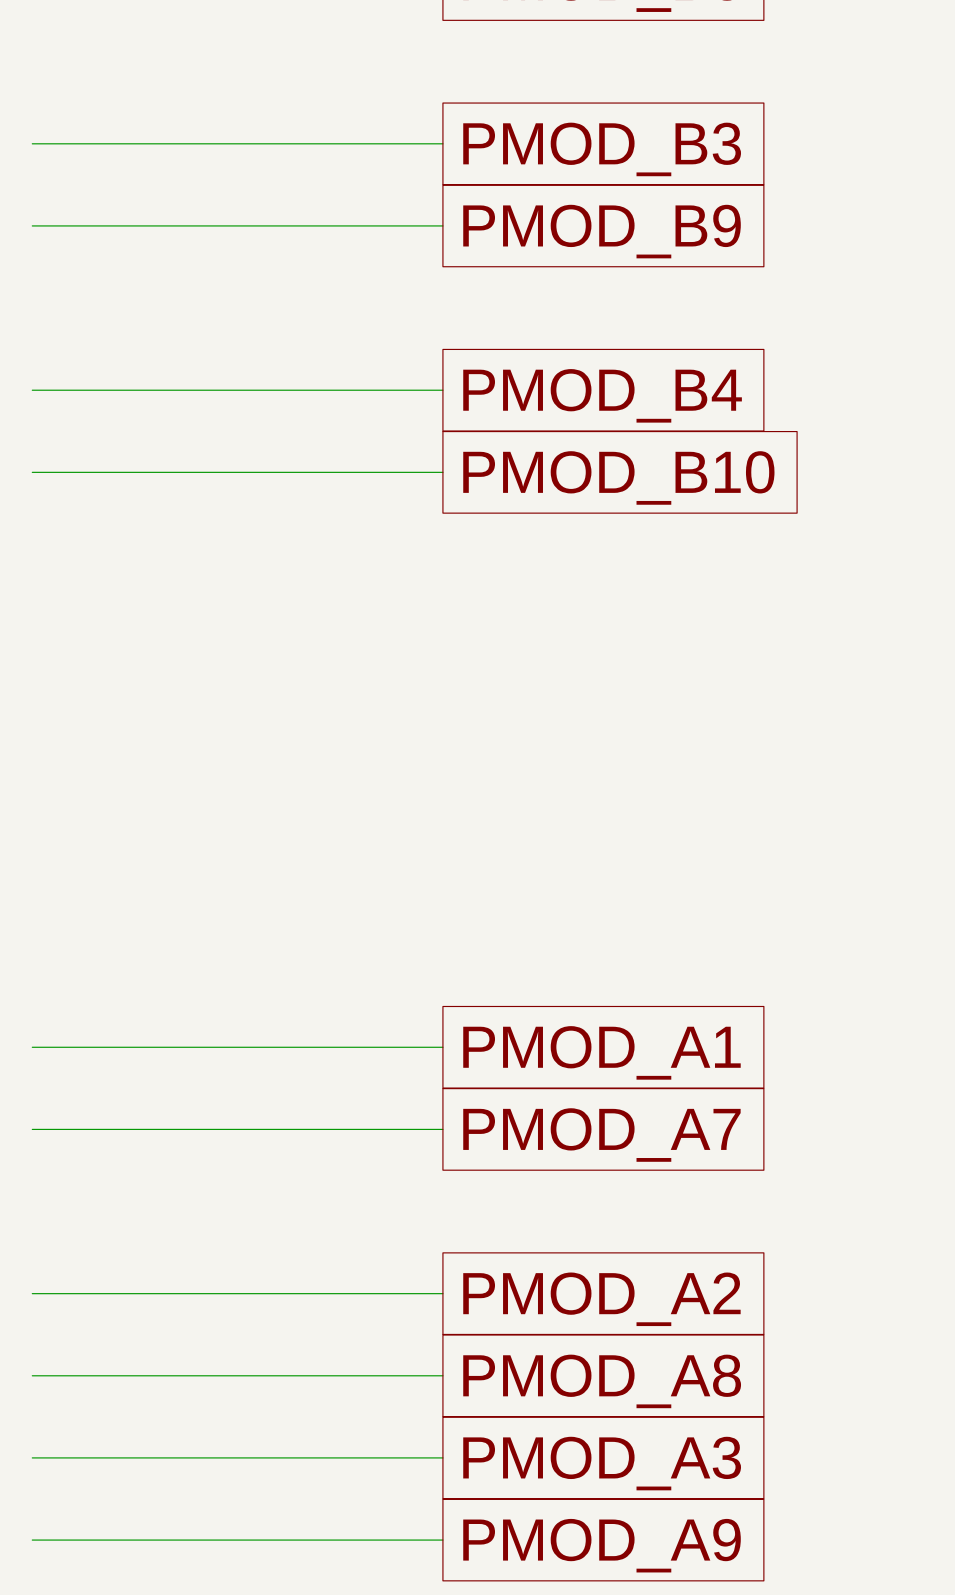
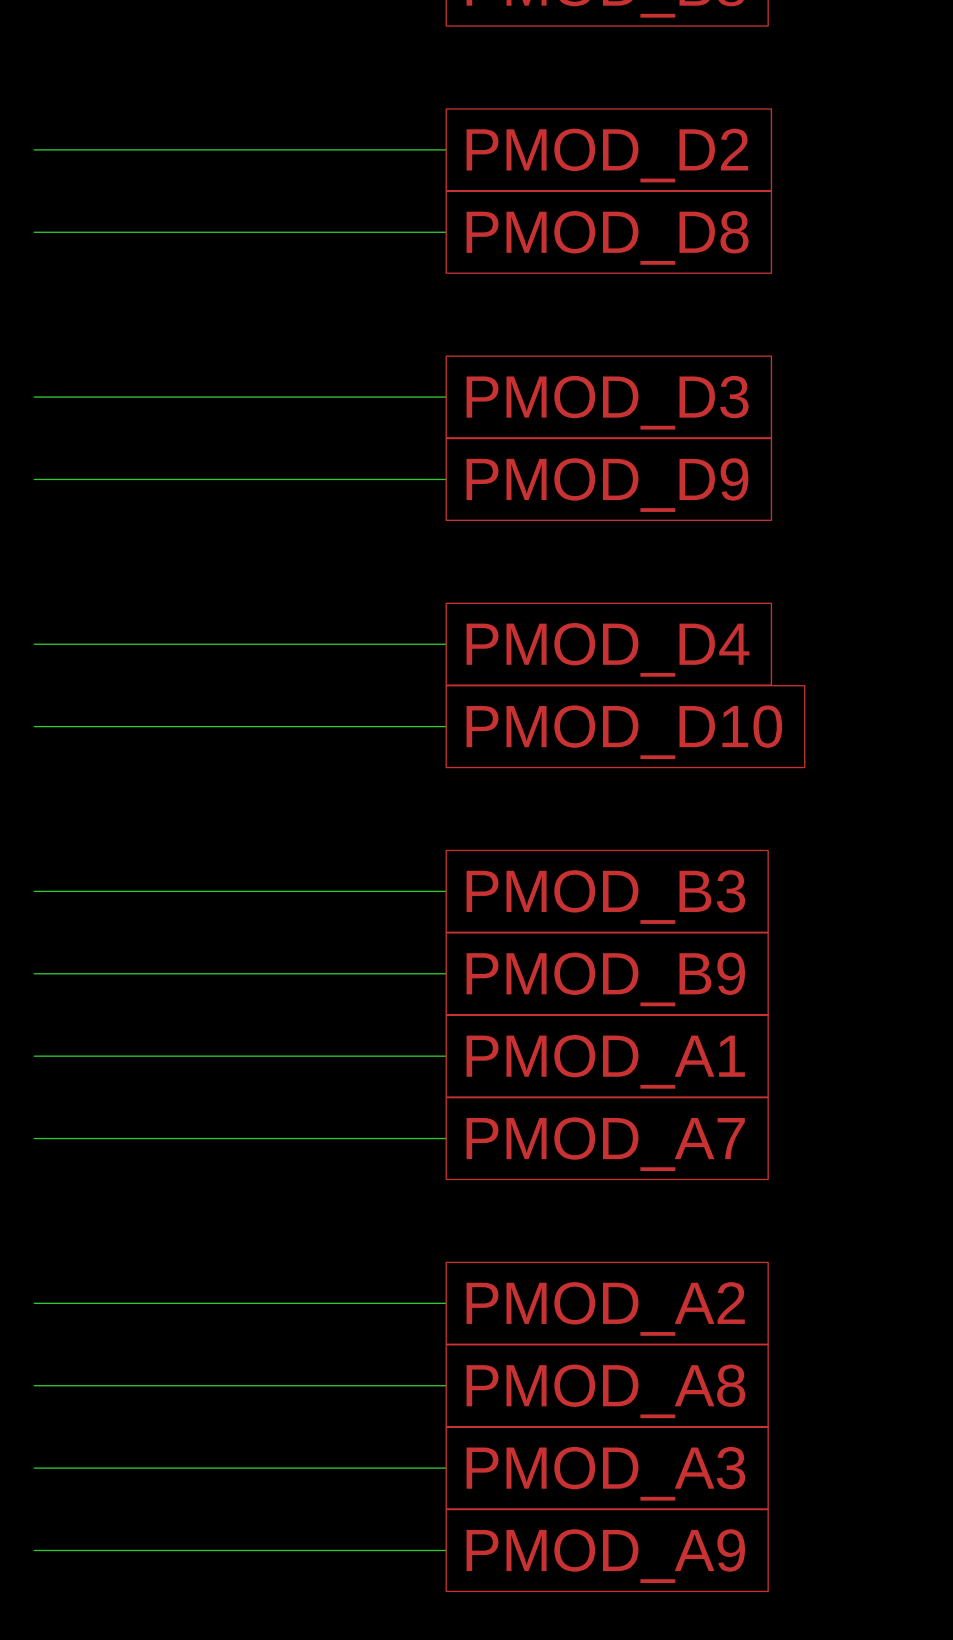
global label: PMOD_B3 (602, 149) -> PMOD_D2 (607, 155)
global label: PMOD_B9 (602, 231) -> PMOD_D8 (607, 237)
global label: PMOD_B4 (602, 395) -> PMOD_D3 (607, 402)
global label: PMOD_B10 (618, 477) -> PMOD_D9 (607, 485)
wire: none -> (34, 644) (446, 644)
global label: none -> PMOD_D4 (607, 649)
wire: none -> (34, 726) (446, 726)
global label: none -> PMOD_D10 (624, 732)
wire: none -> (34, 891) (446, 891)
global label: none -> PMOD_B3 (605, 897)
wire: none -> (34, 973) (446, 973)
global label: none -> PMOD_B9 (605, 979)

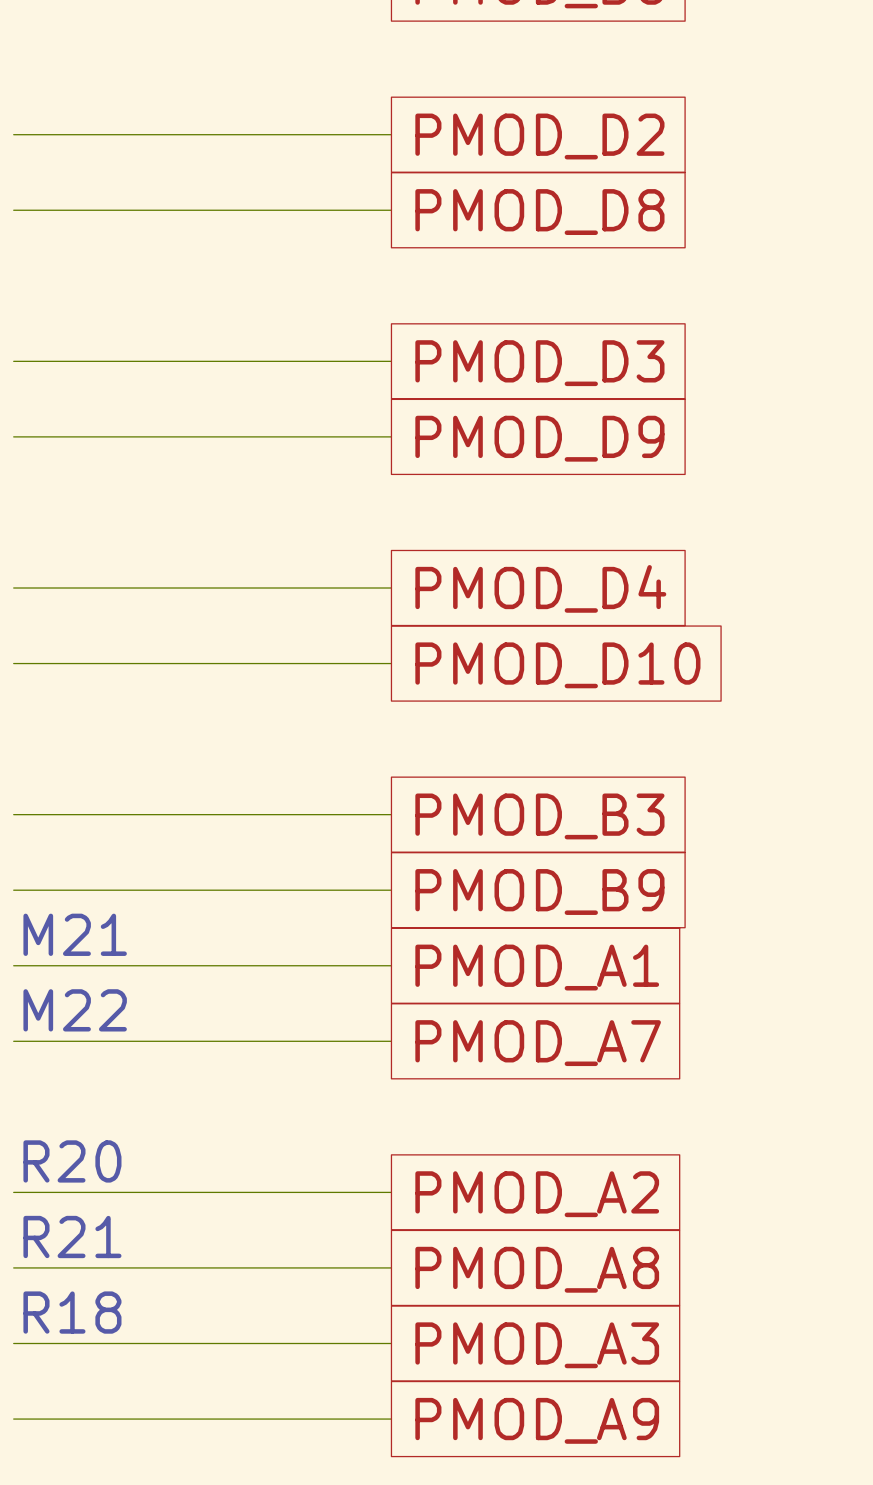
text: none -> M21 (75, 934)
text: none -> M22 (75, 1010)
text: none -> R20 (72, 1161)
text: none -> R21 (72, 1237)
text: none -> R18 (72, 1312)

